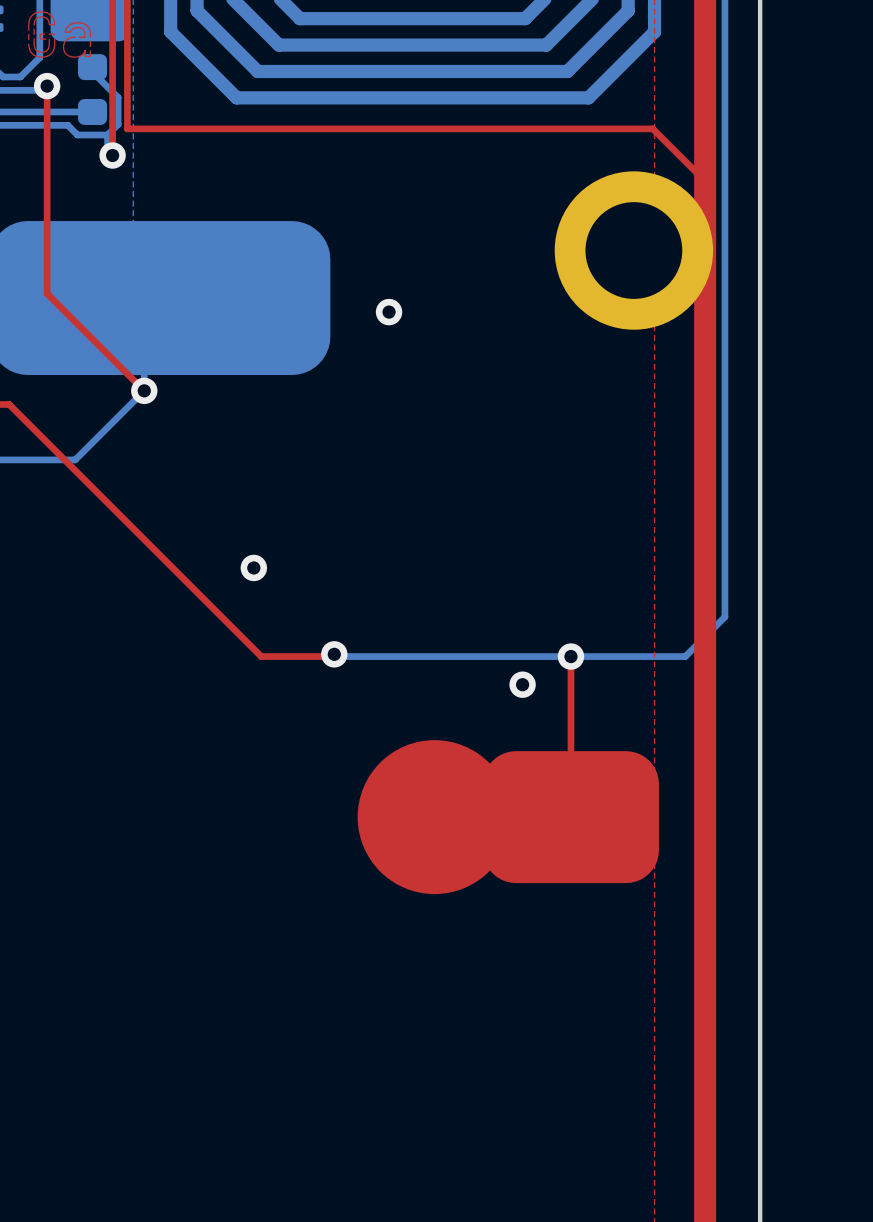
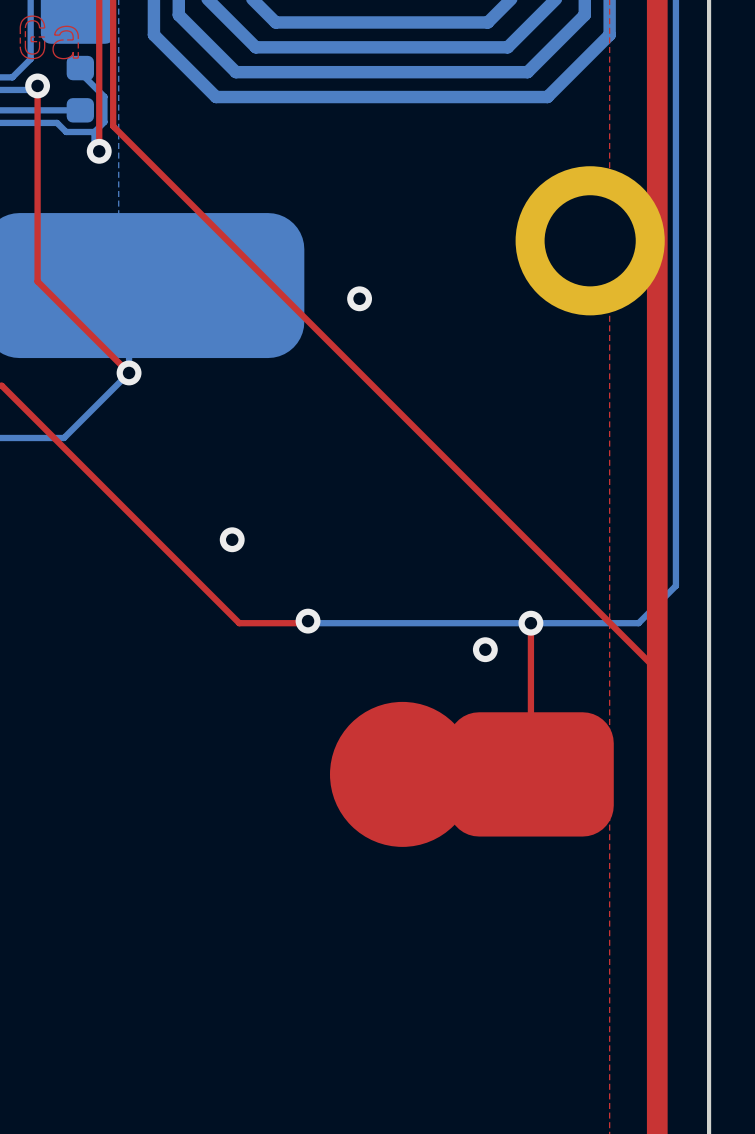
top track: (127, 128) (652, 128) (705, 181) (705, 706) -> (113, 126) (657, 670)

